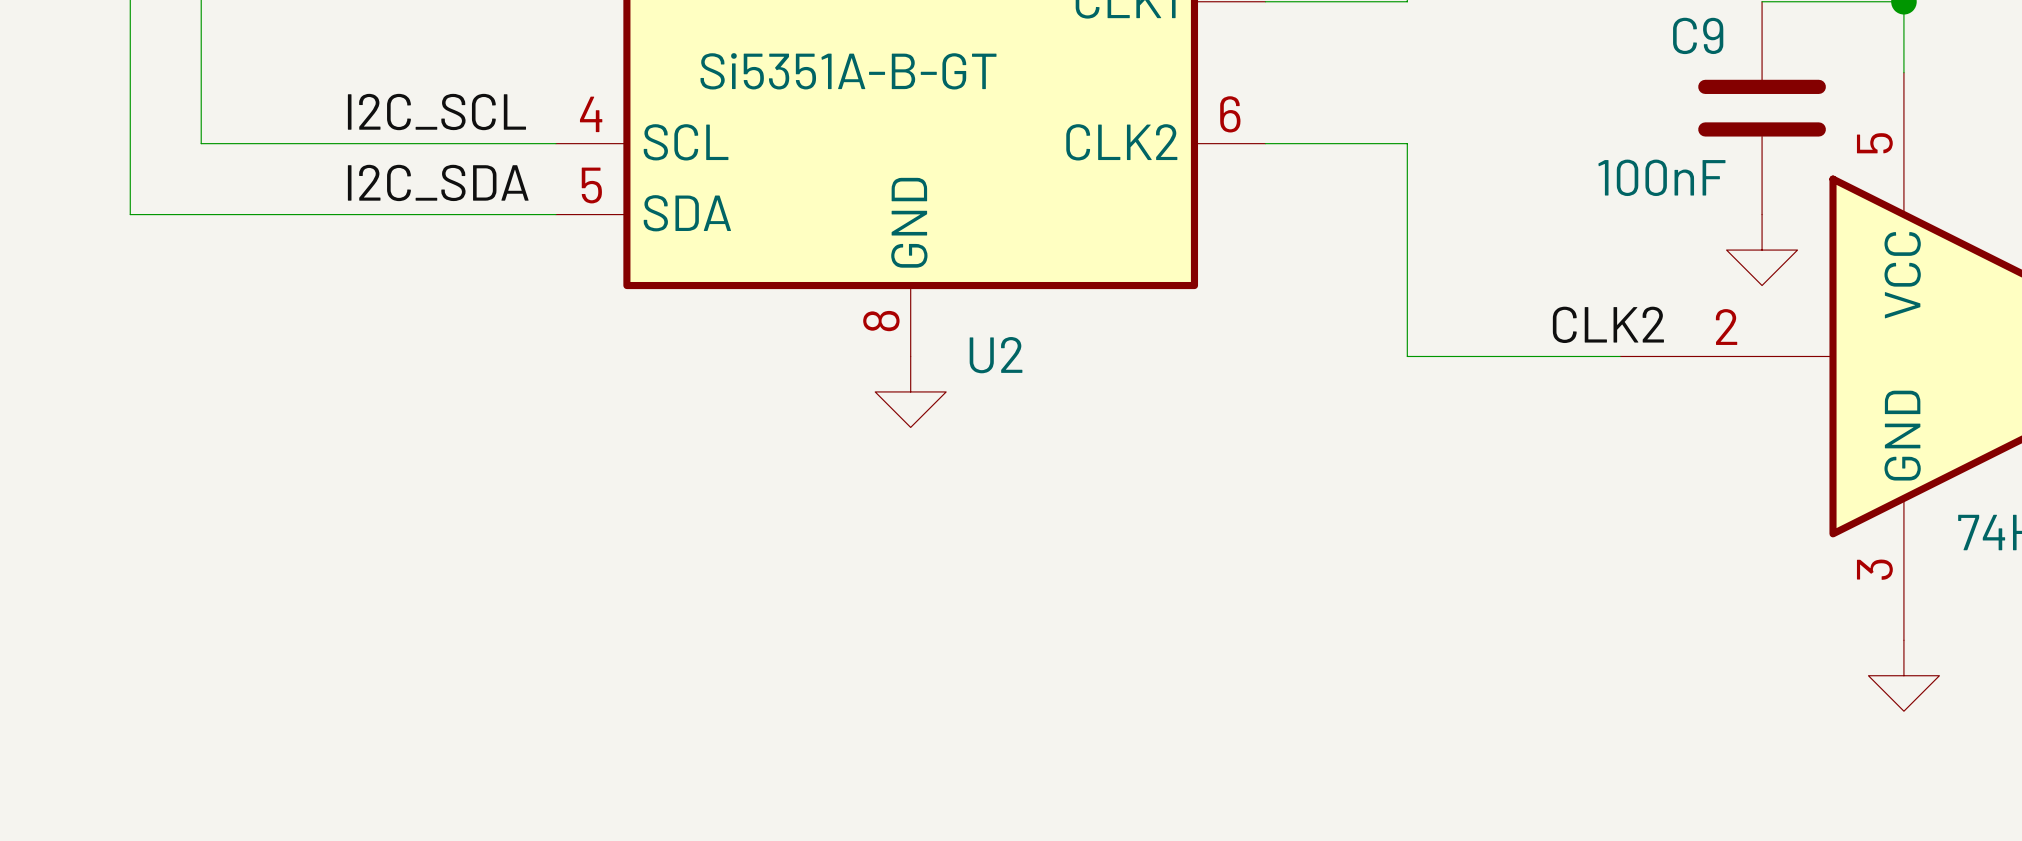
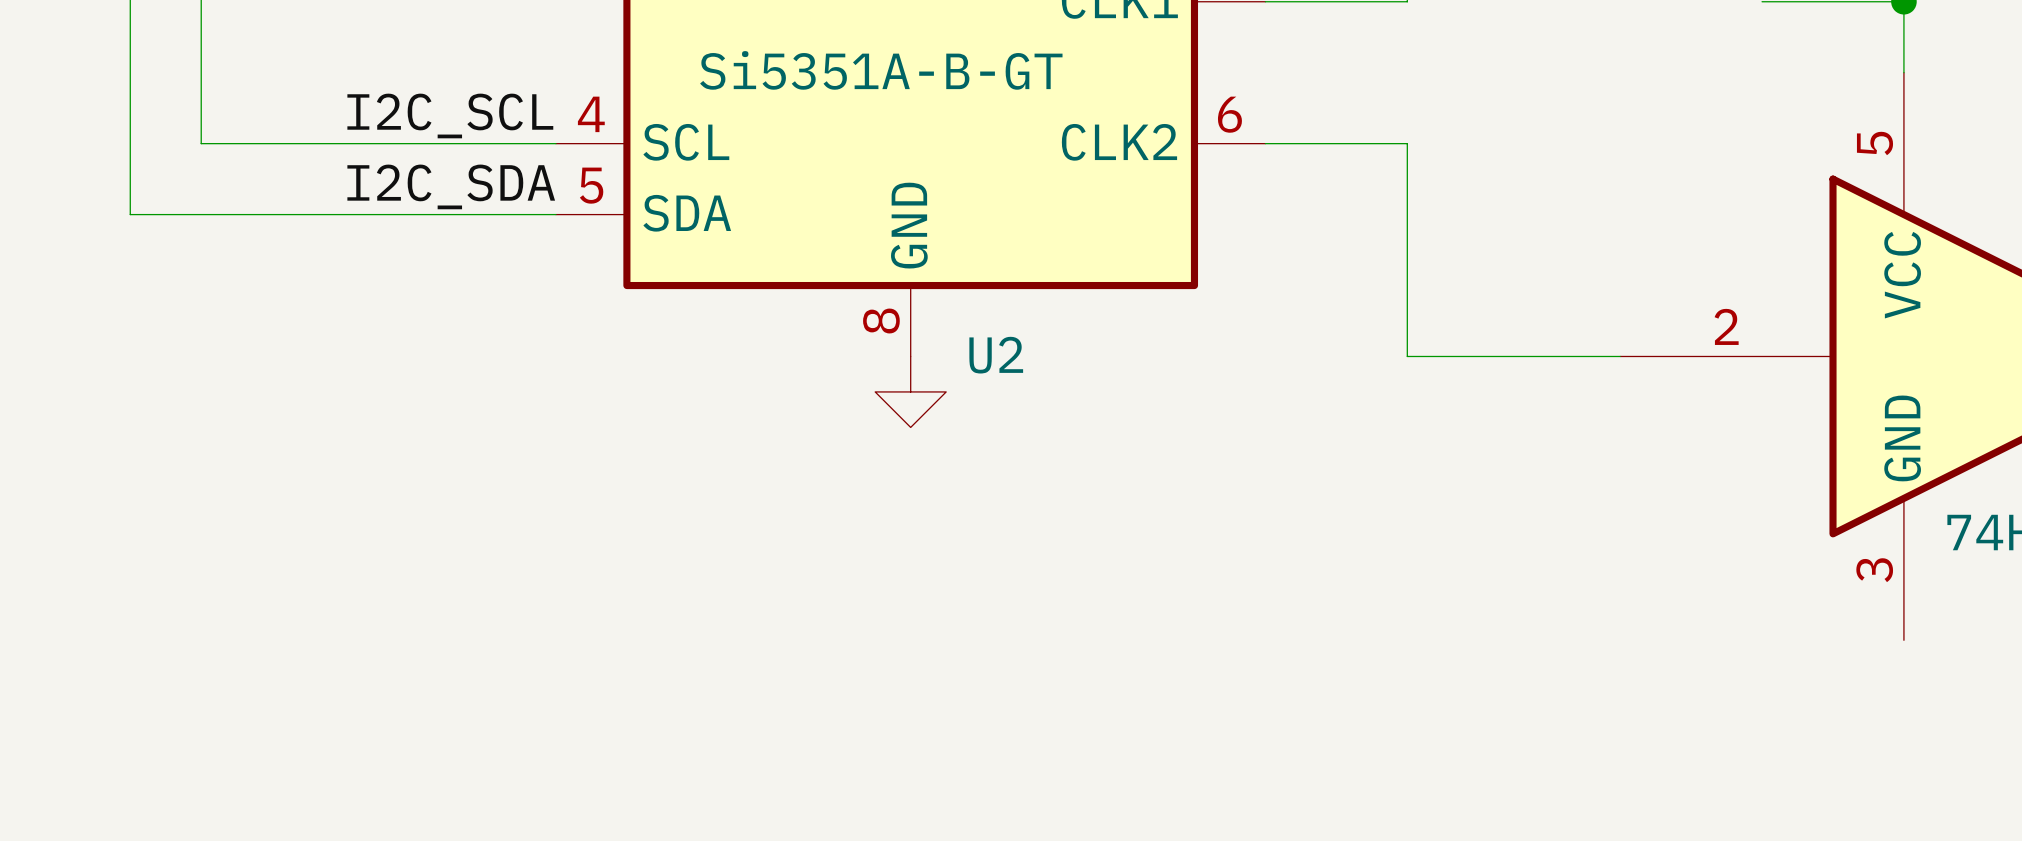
C9: 100nF (1762, 108) -> none
power symbol: (1762, 250) -> none
label: CLK2 (1608, 324) -> none
power symbol: (1903, 675) -> none

